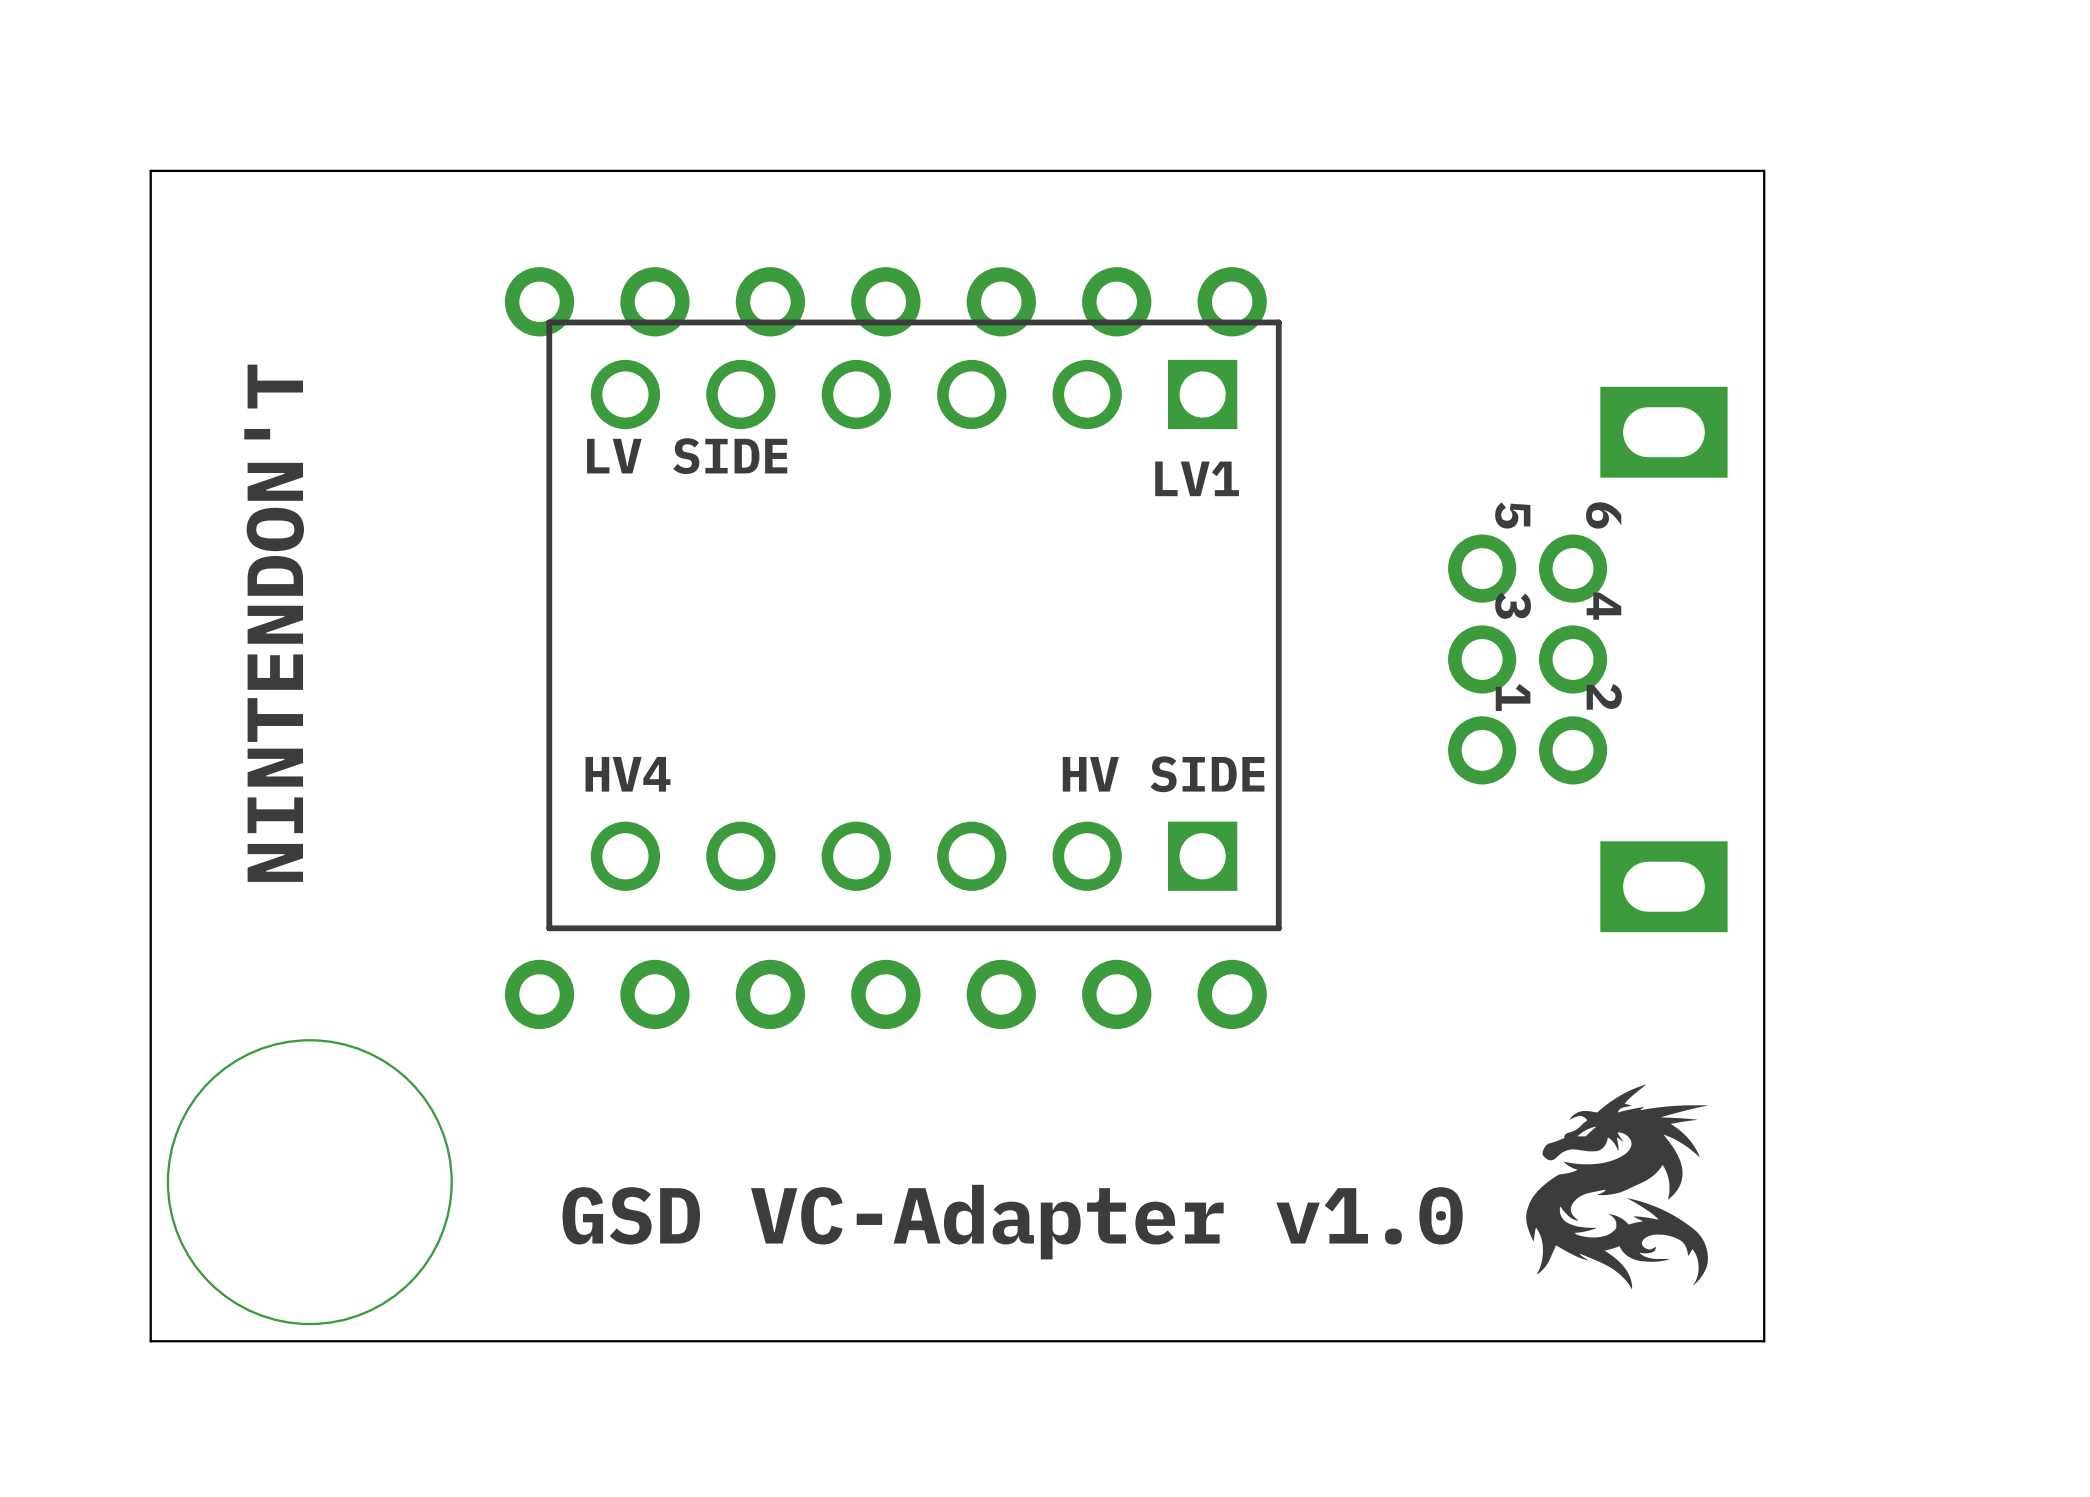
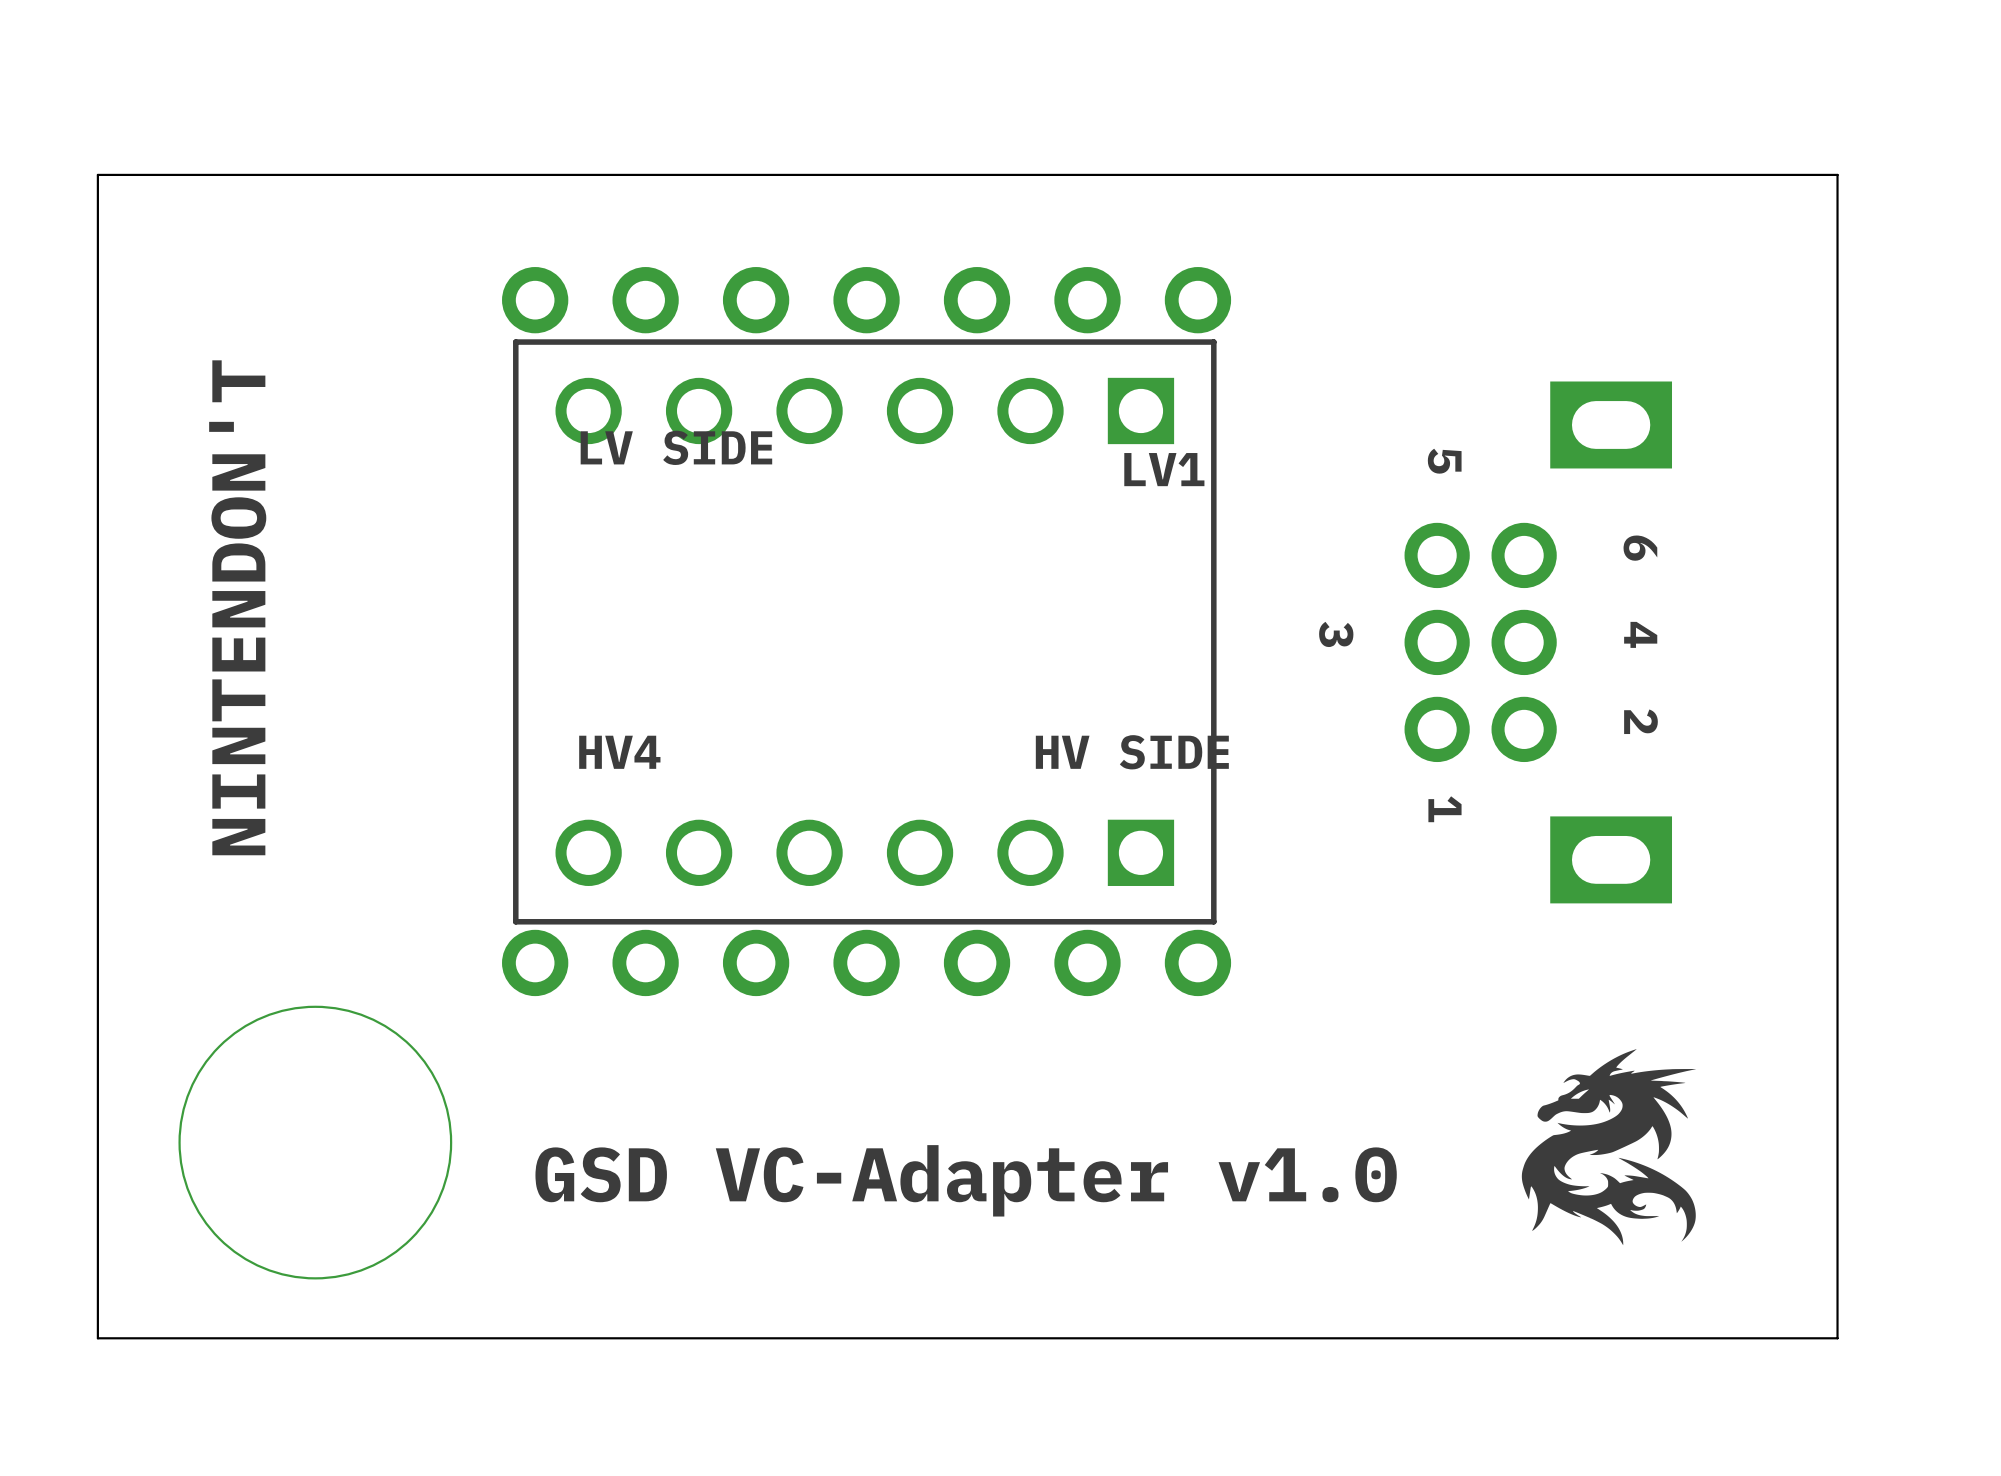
board edge: (150, 170) (150, 1341) (1764, 1341) (1764, 170) -> (163, 174) (97, 174) (97, 1338) (1837, 1338) (1837, 174) (1707, 174)
text position: 5 (1512, 515) -> 5 (1444, 461)
text position: 6 (1603, 515) -> 6 (1640, 548)
text position: 3 (1513, 605) -> 3 (1336, 634)
text position: 4 (1603, 606) -> 4 (1640, 634)
text position: NINTENDON'T (274, 623) -> NINTENDON'T (237, 607)
part position: (914, 625) -> (864, 631)
text position: 2 (1604, 696) -> 2 (1640, 721)
text position: 1 (1513, 697) -> 1 (1444, 809)
drawing position: (1617, 1186) -> (1608, 1147)
text position: GSD VC-Adapter v1.0 (1012, 1222) -> GSD VC-Adapter v1.0 (966, 1180)

